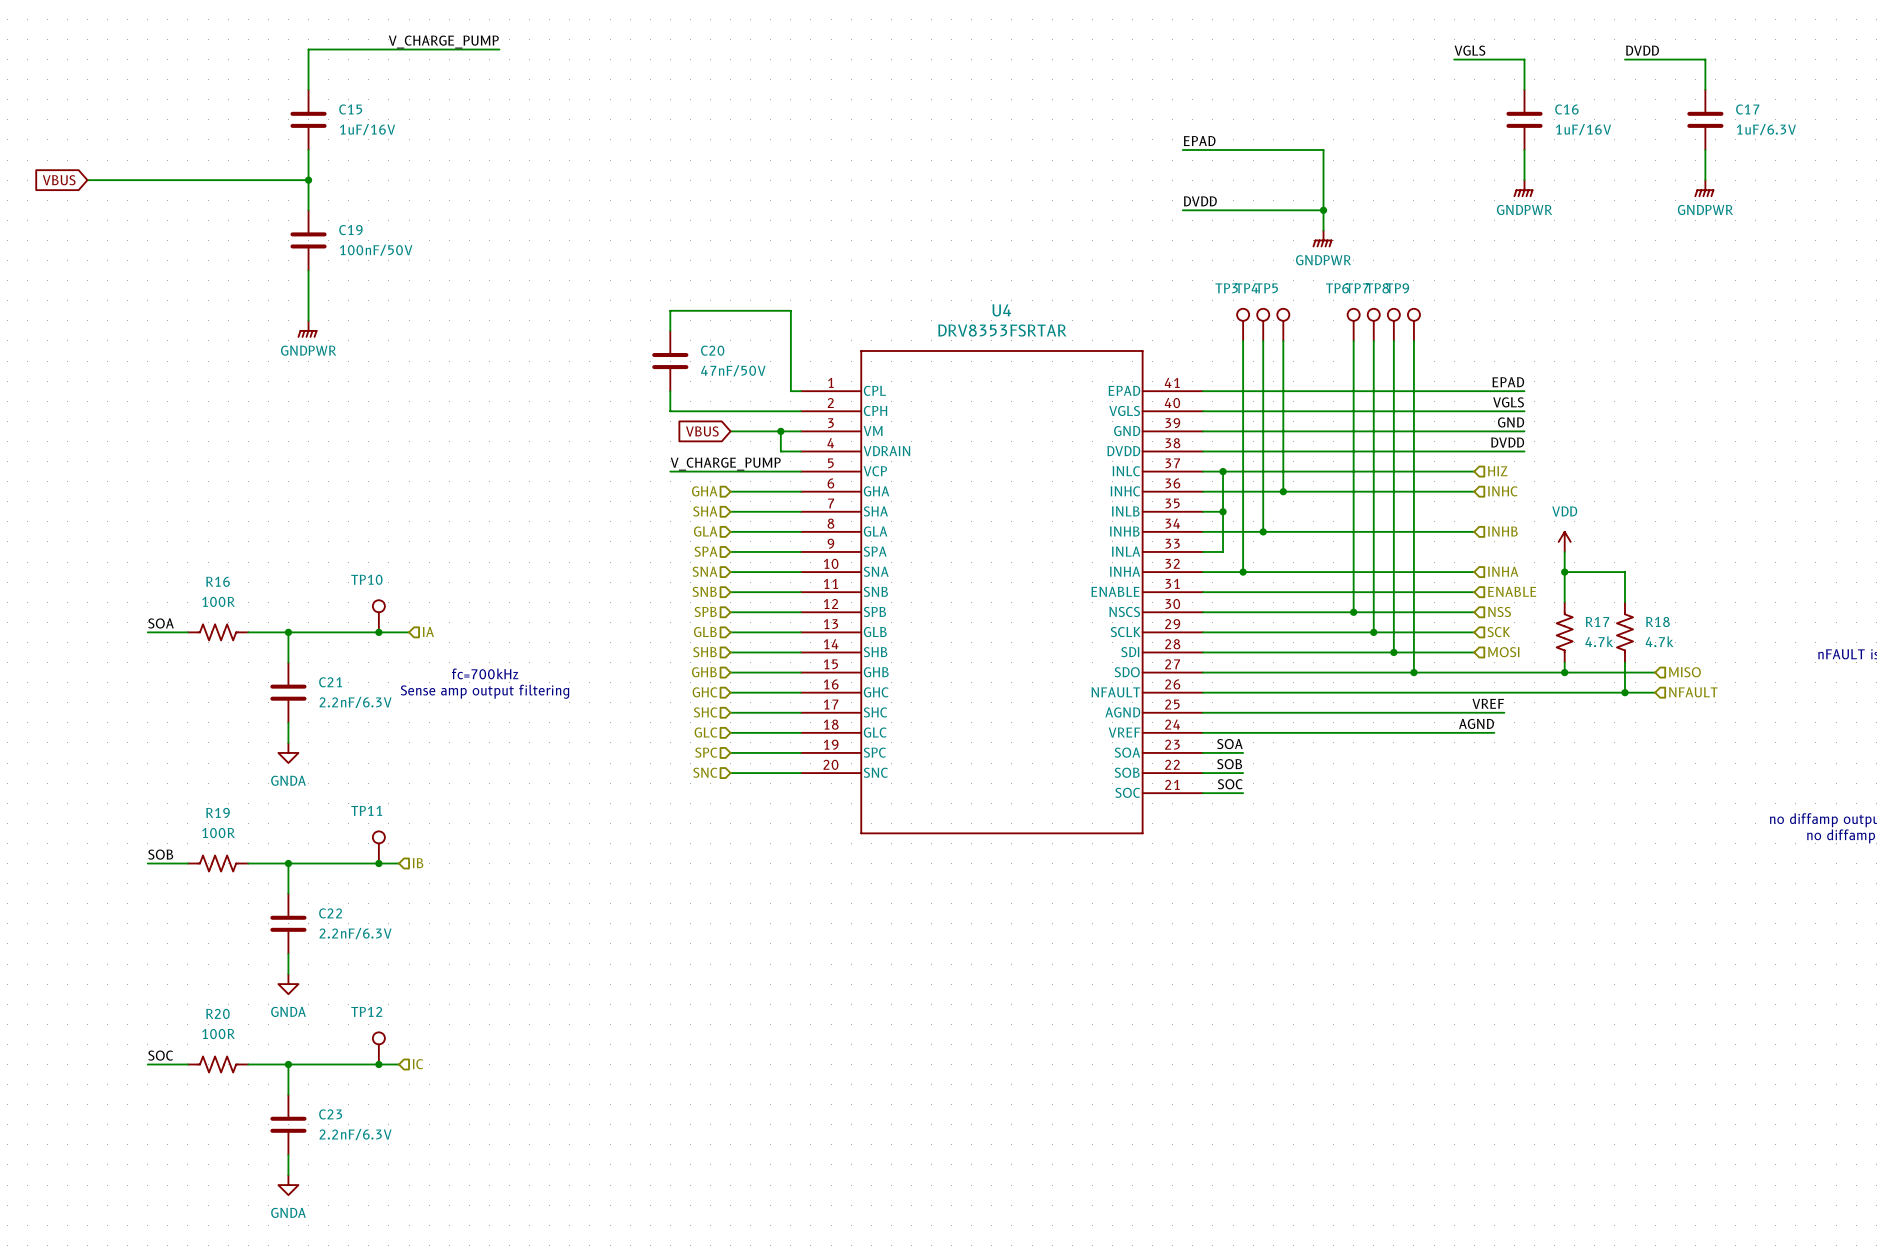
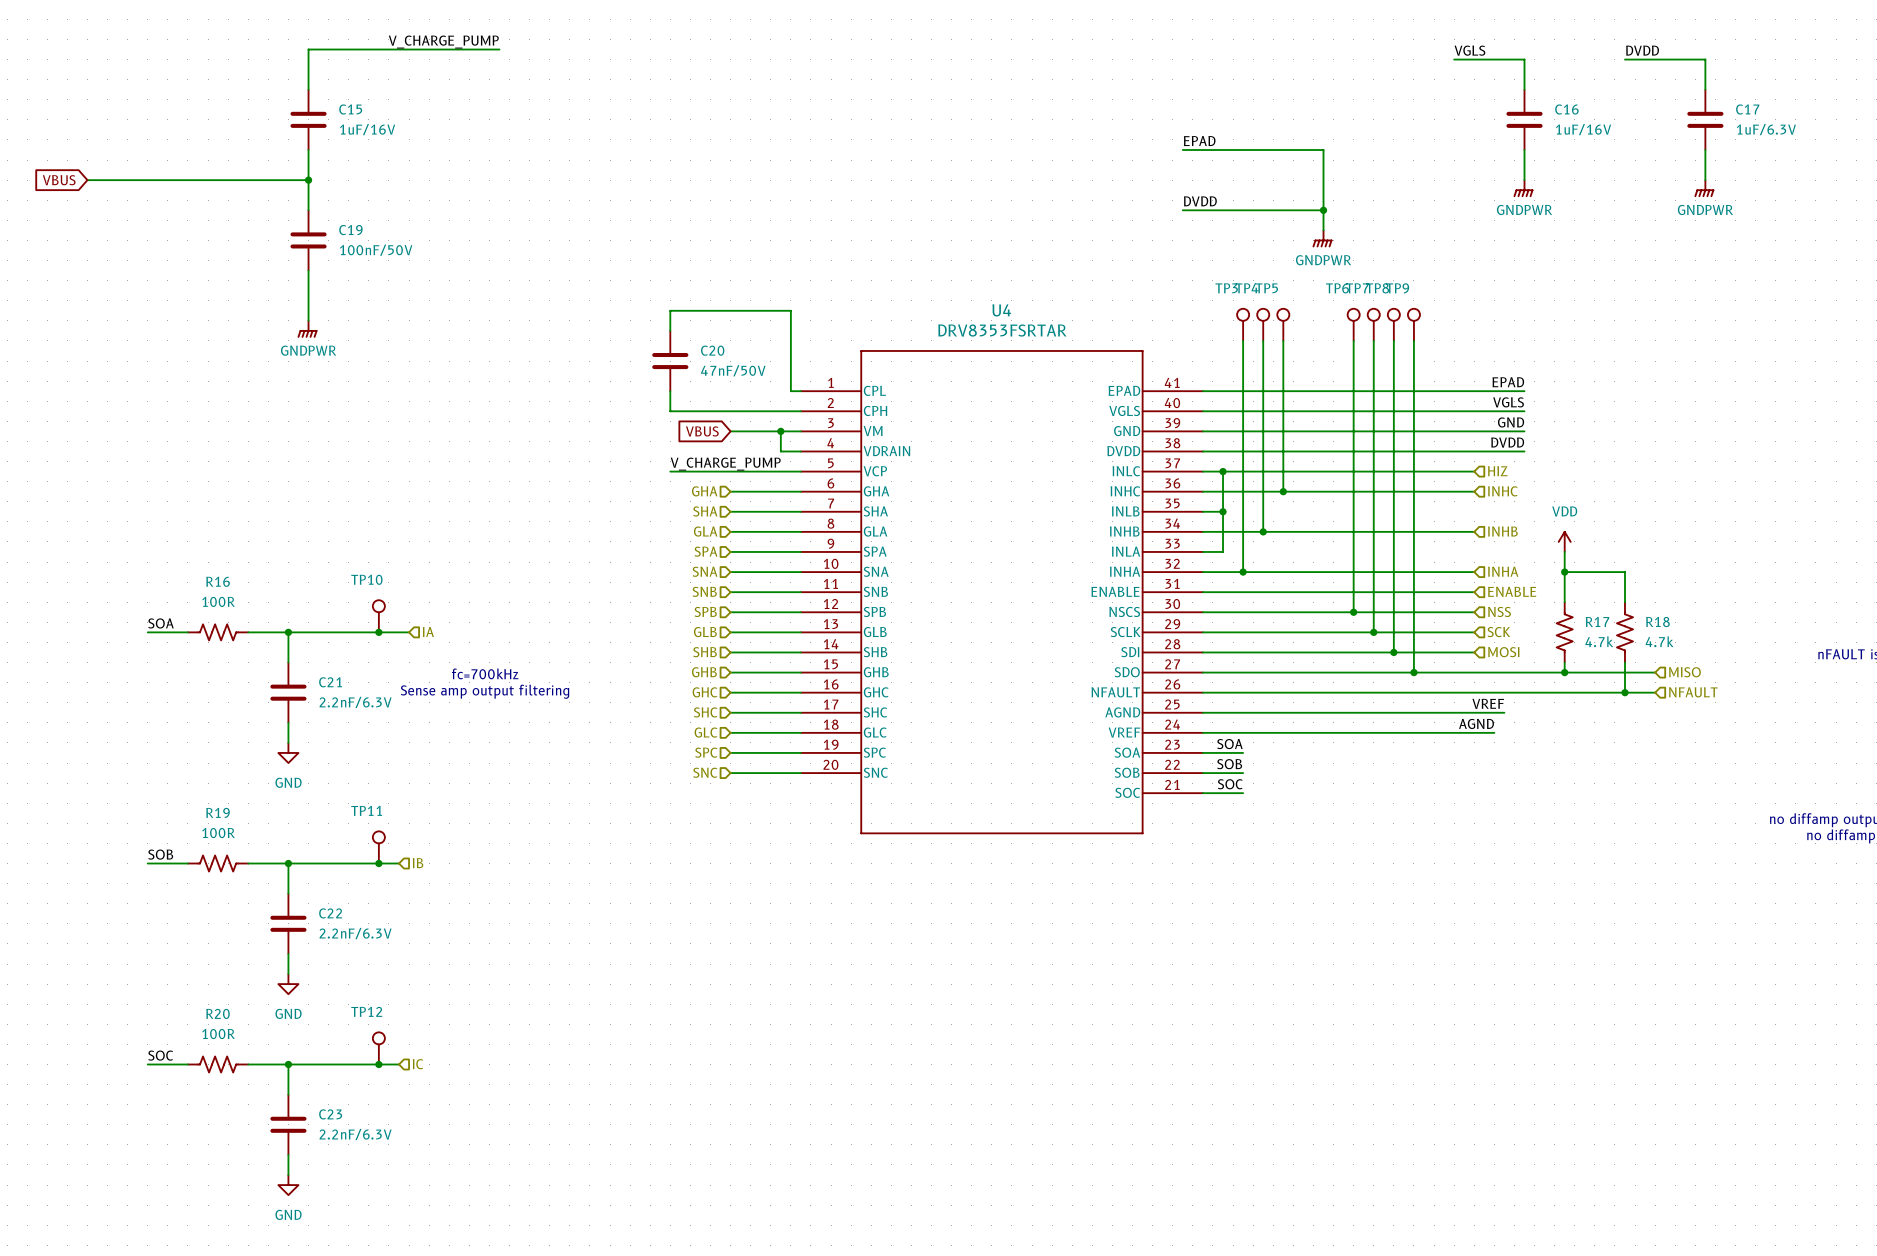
power symbol: GNDA (288, 752) -> GND (288, 752)
power symbol: GNDA (288, 984) -> GND (288, 984)
power symbol: GNDA (288, 1185) -> GND (288, 1185)

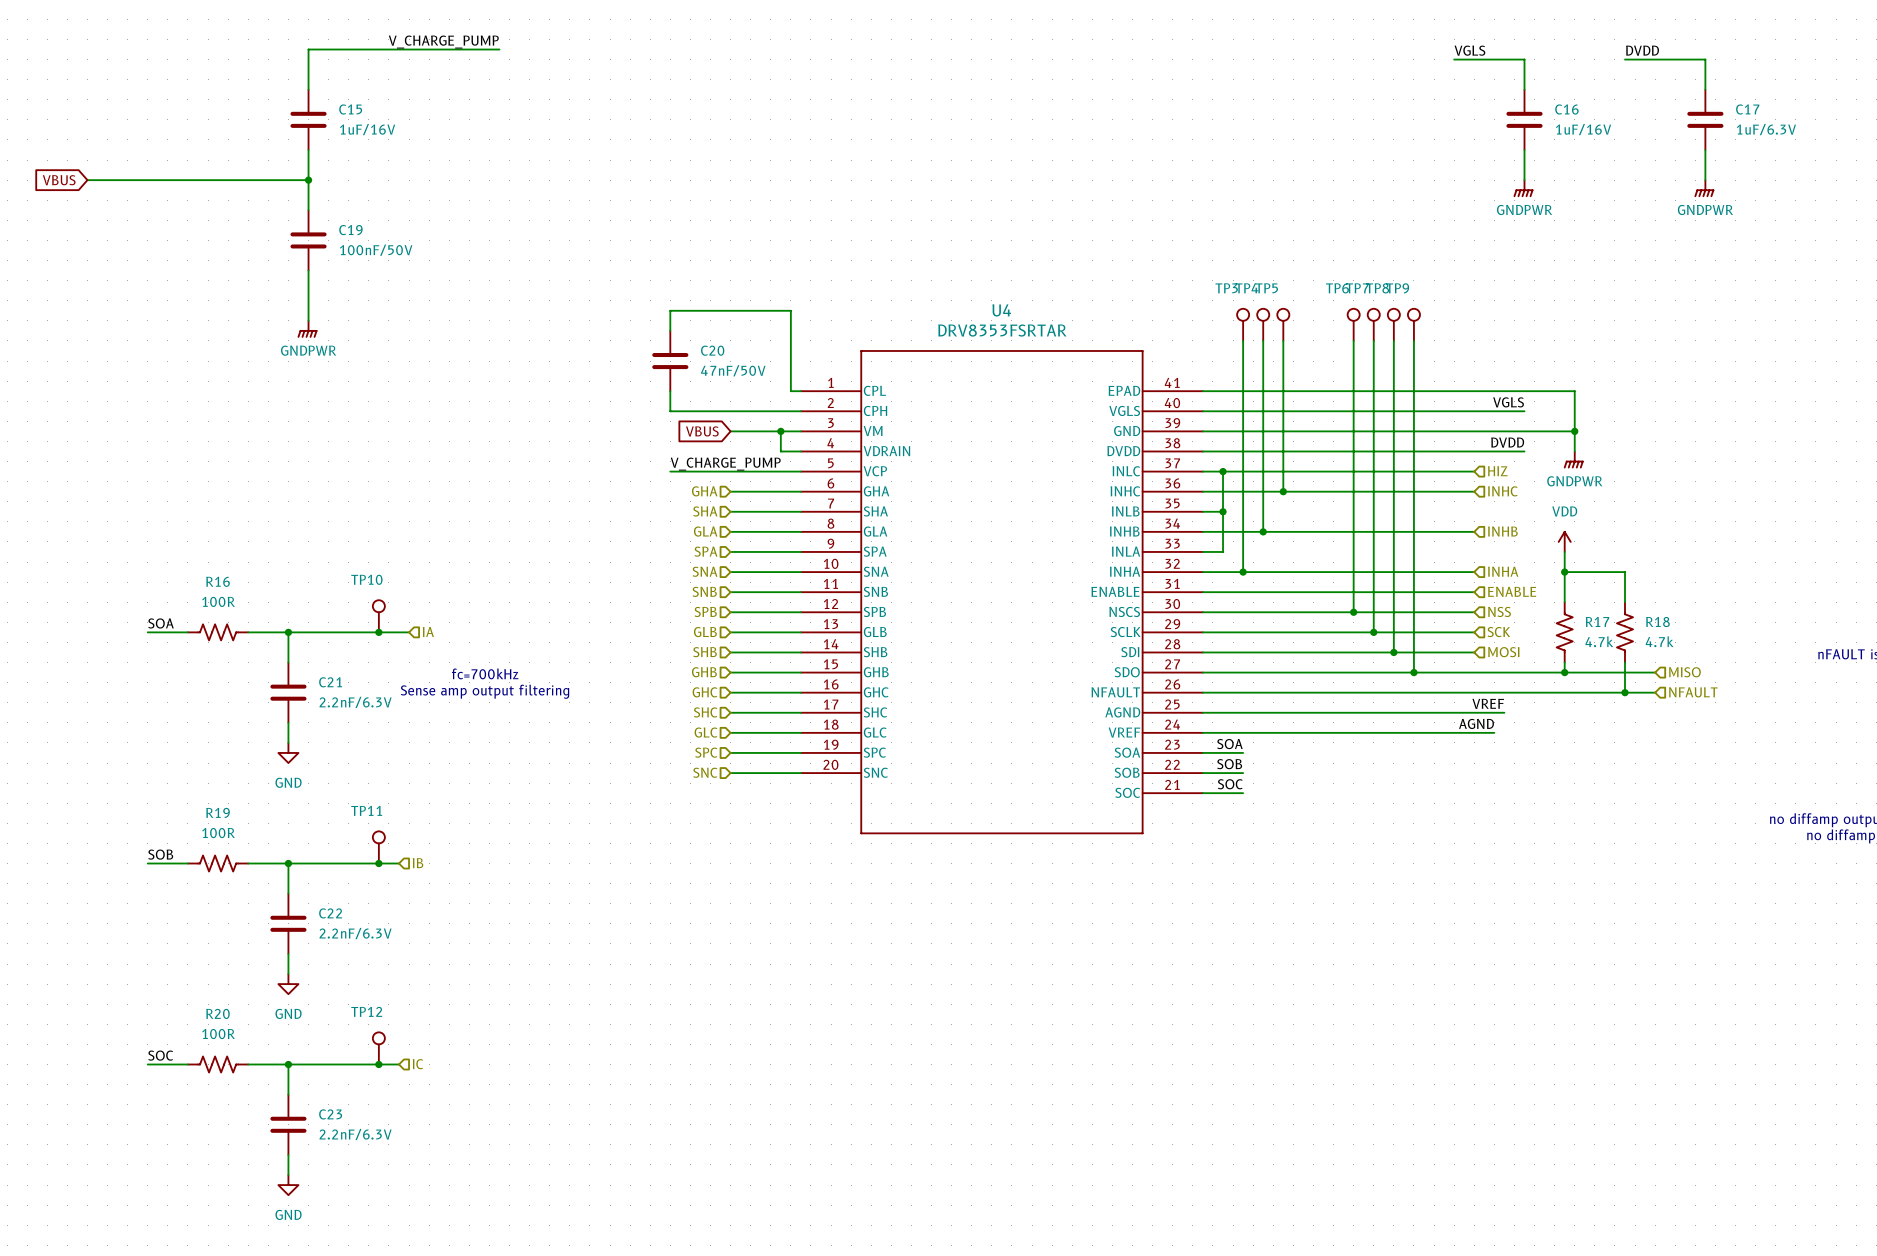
label: EPAD (1199, 141) -> none
wire: (1182, 150) (1323, 150) (1323, 230) -> none
label: DVDD (1200, 201) -> none
wire: (1182, 210) (1323, 210) -> none
junction: (1323, 210) -> none
power symbol: GNDPWR (1322, 238) -> none
label: EPAD (1508, 382) -> none
wire: none -> (1524, 391) (1574, 391) (1574, 451)
label: GND (1511, 422) -> none
wire: none -> (1524, 431) (1574, 431)
junction: none -> (1574, 431)
power symbol: none -> GNDPWR (1573, 459)

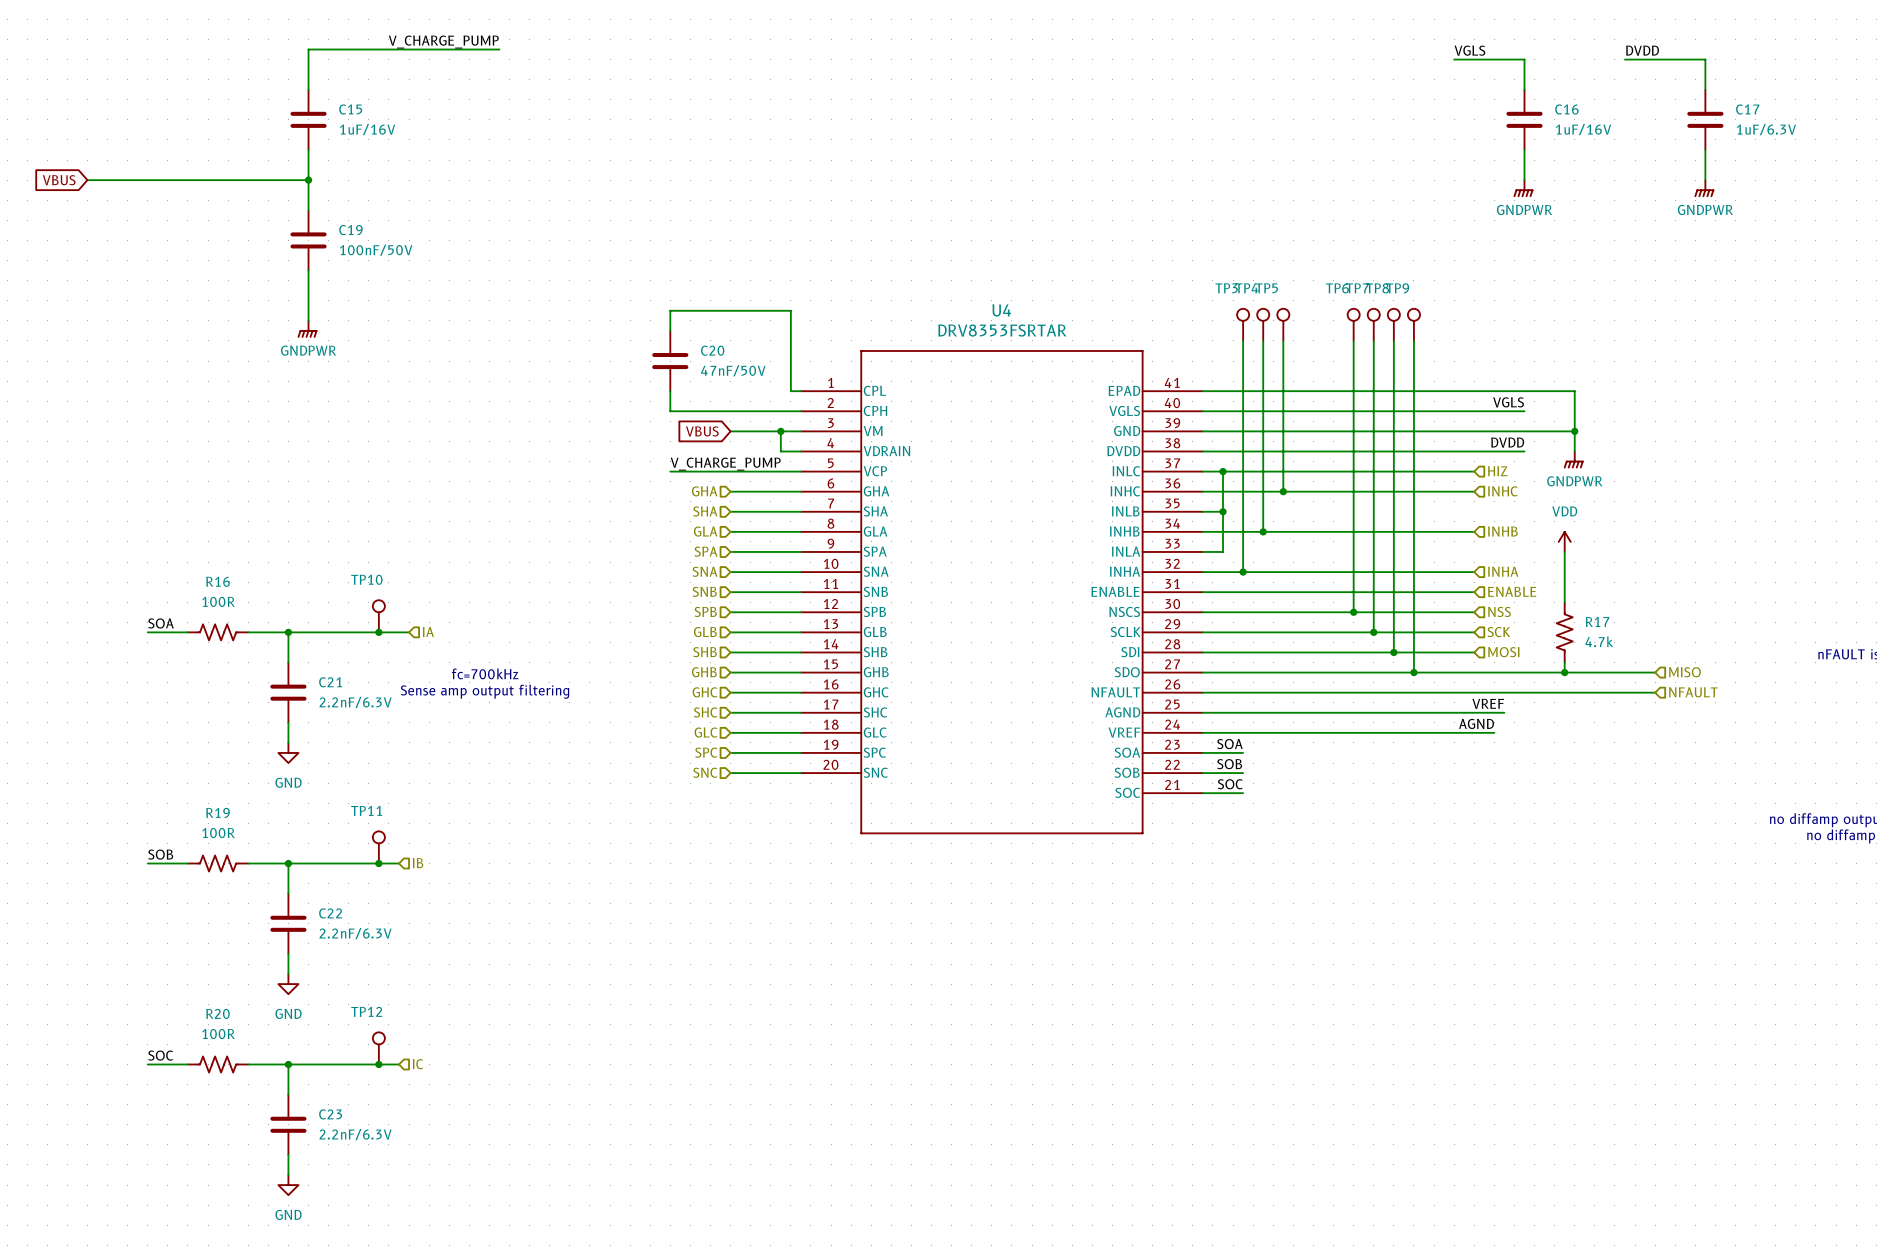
wire: (1564, 572) (1624, 572) (1624, 602) -> none
junction: (1564, 572) -> none
R18: 4.7k (1624, 632) -> none
wire: (1624, 662) (1624, 692) -> none
junction: (1624, 692) -> none

